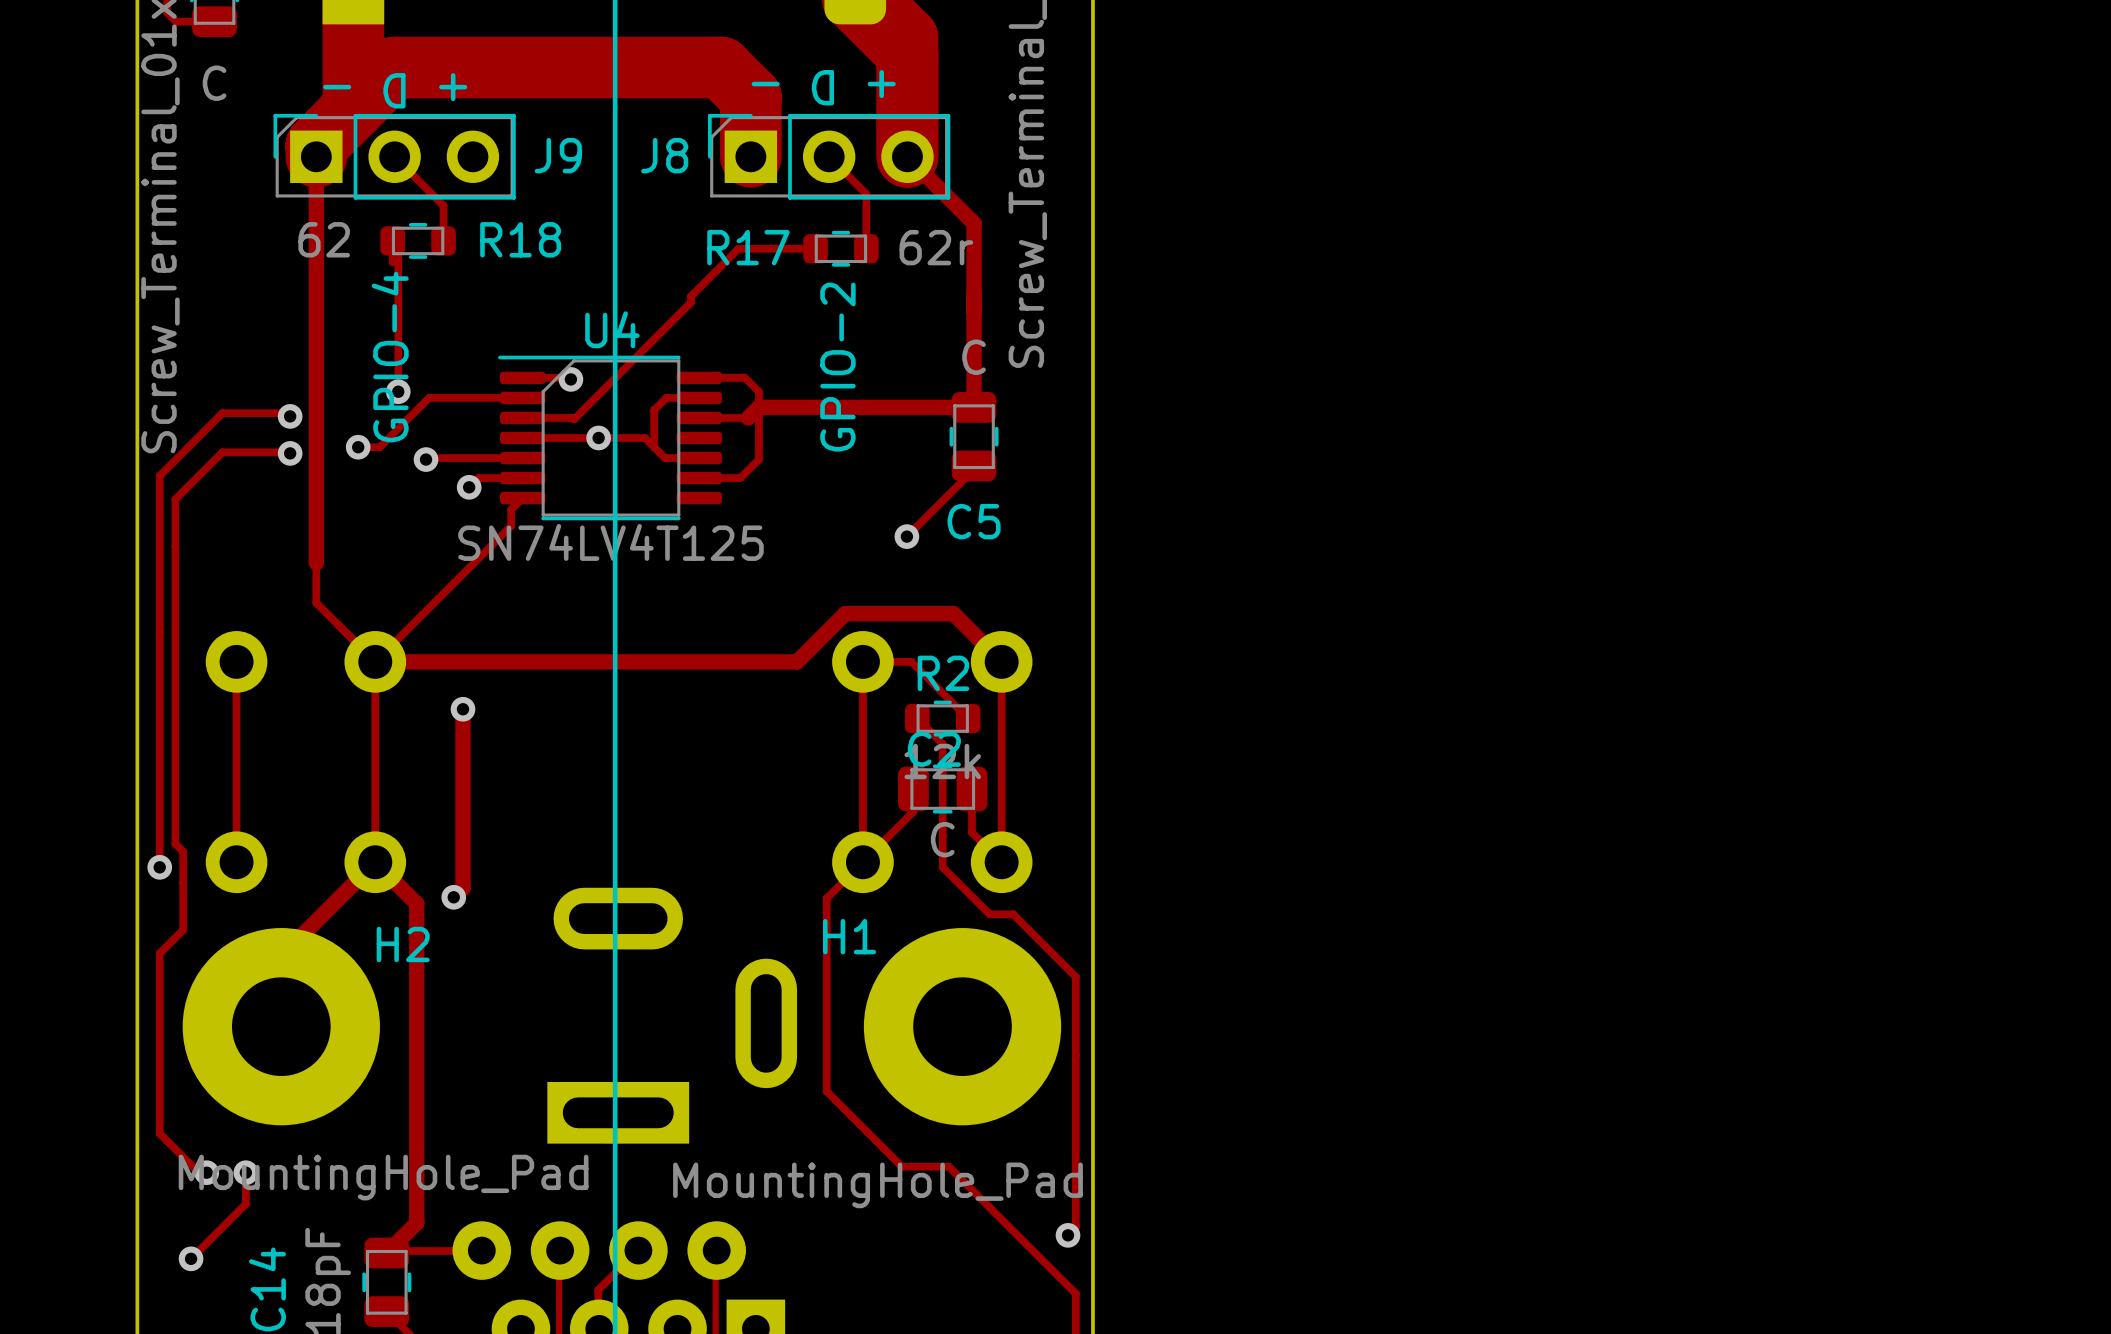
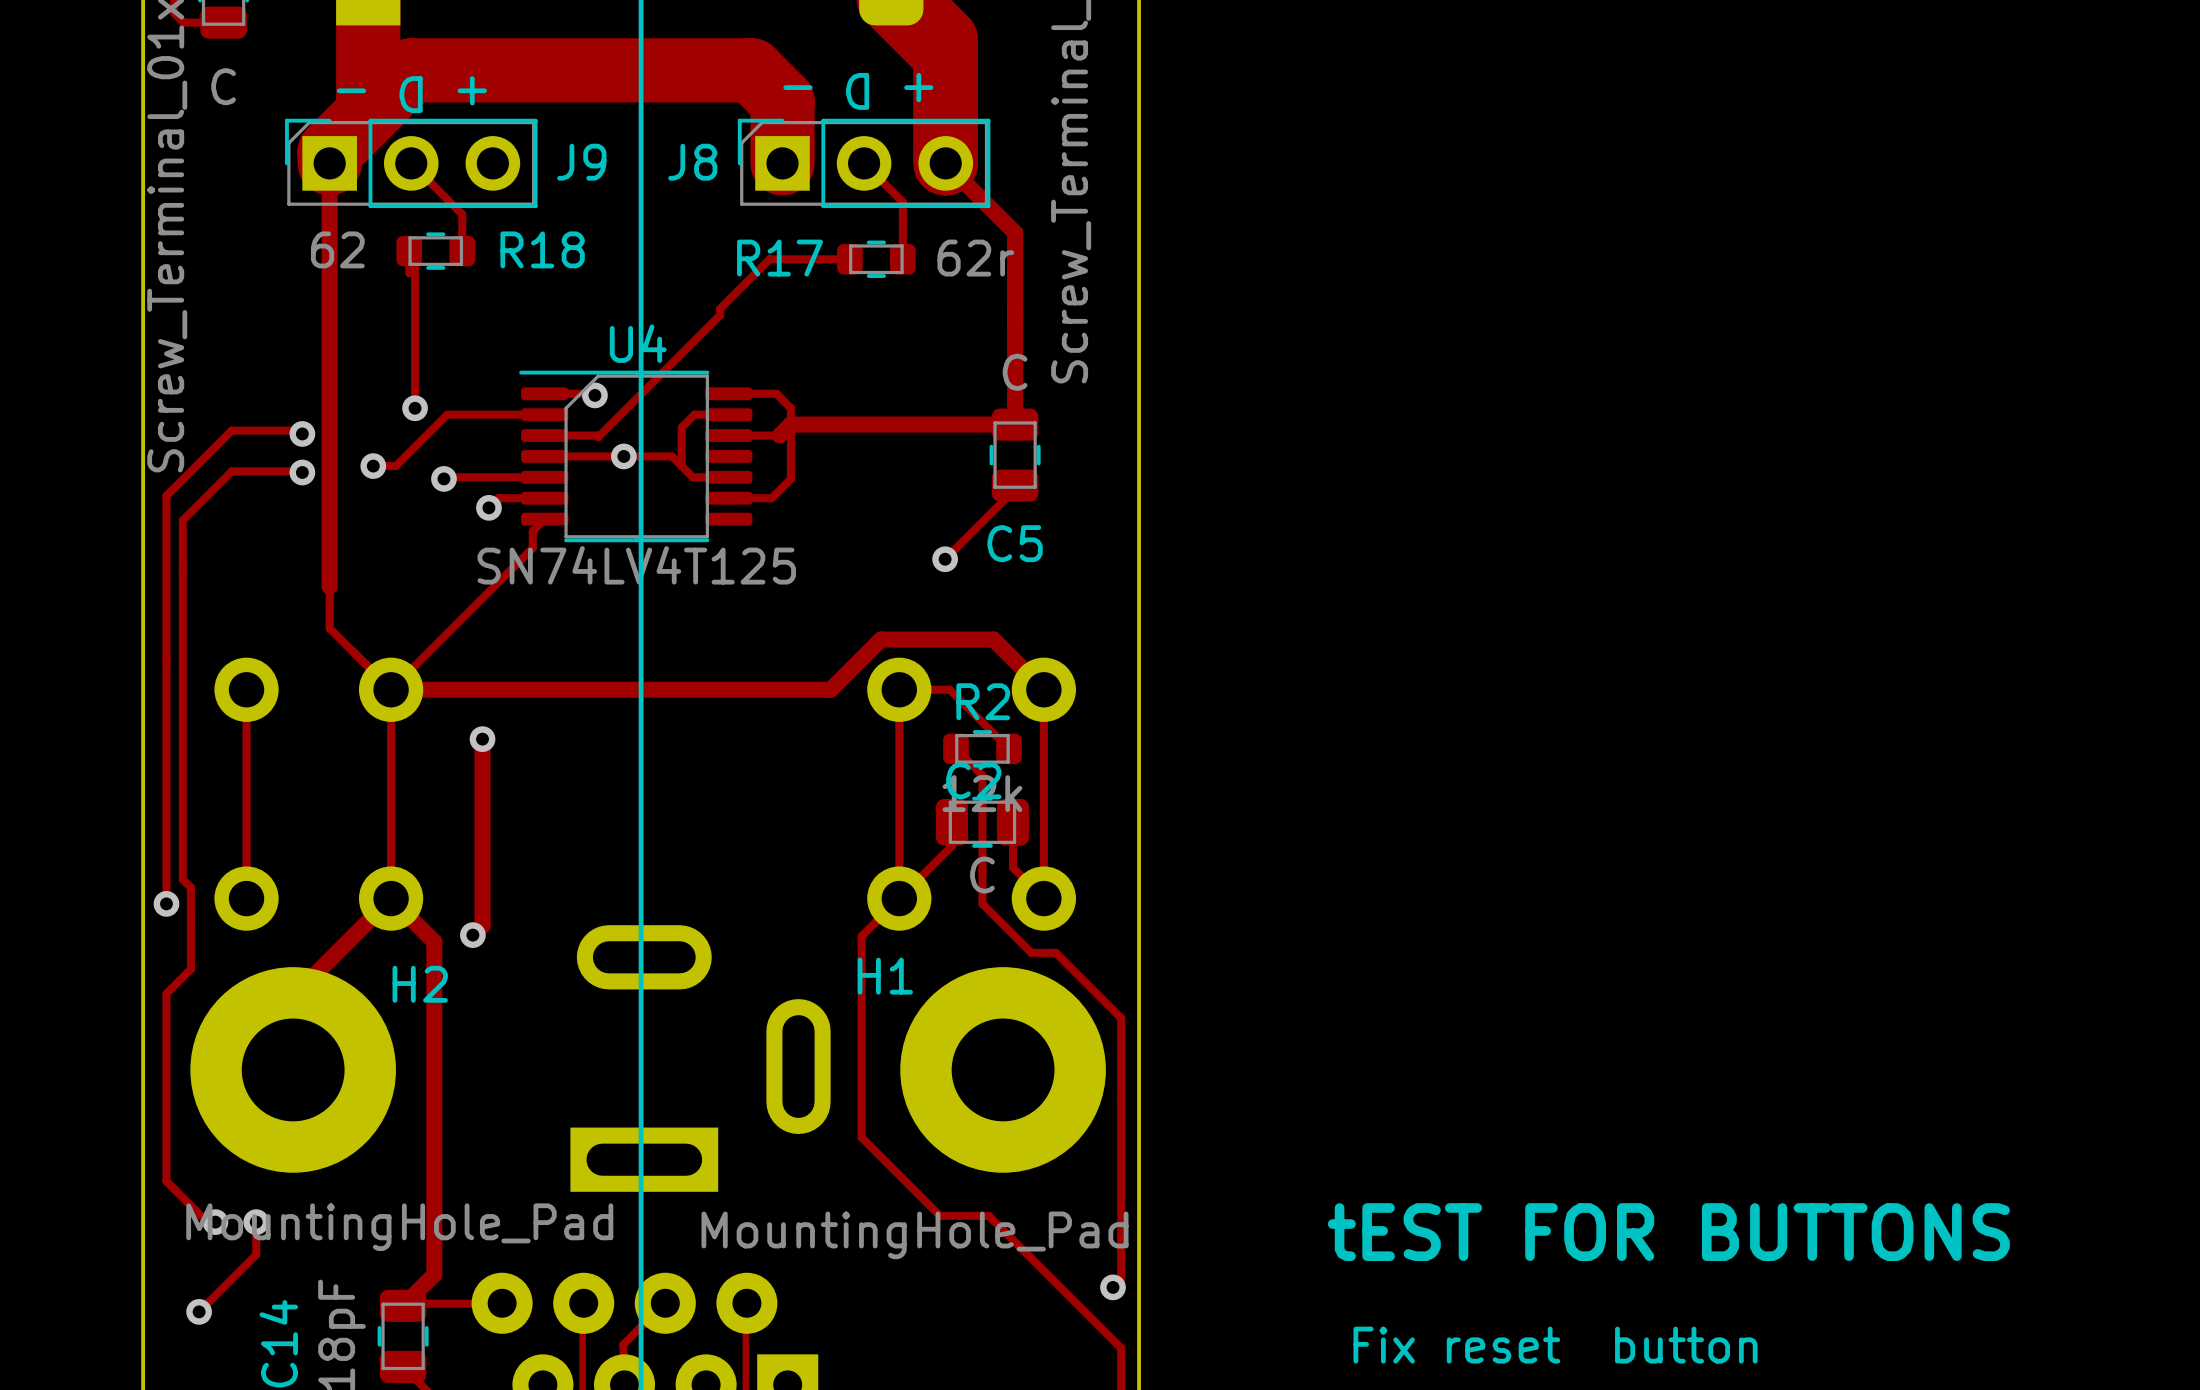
text: GPIO-4 (390, 357) -> none
text: GPIO-2 (837, 367) -> none
text: none -> tEST FOR BUTTONS (1668, 1232)
text: none -> Fix reset button (1555, 1345)

